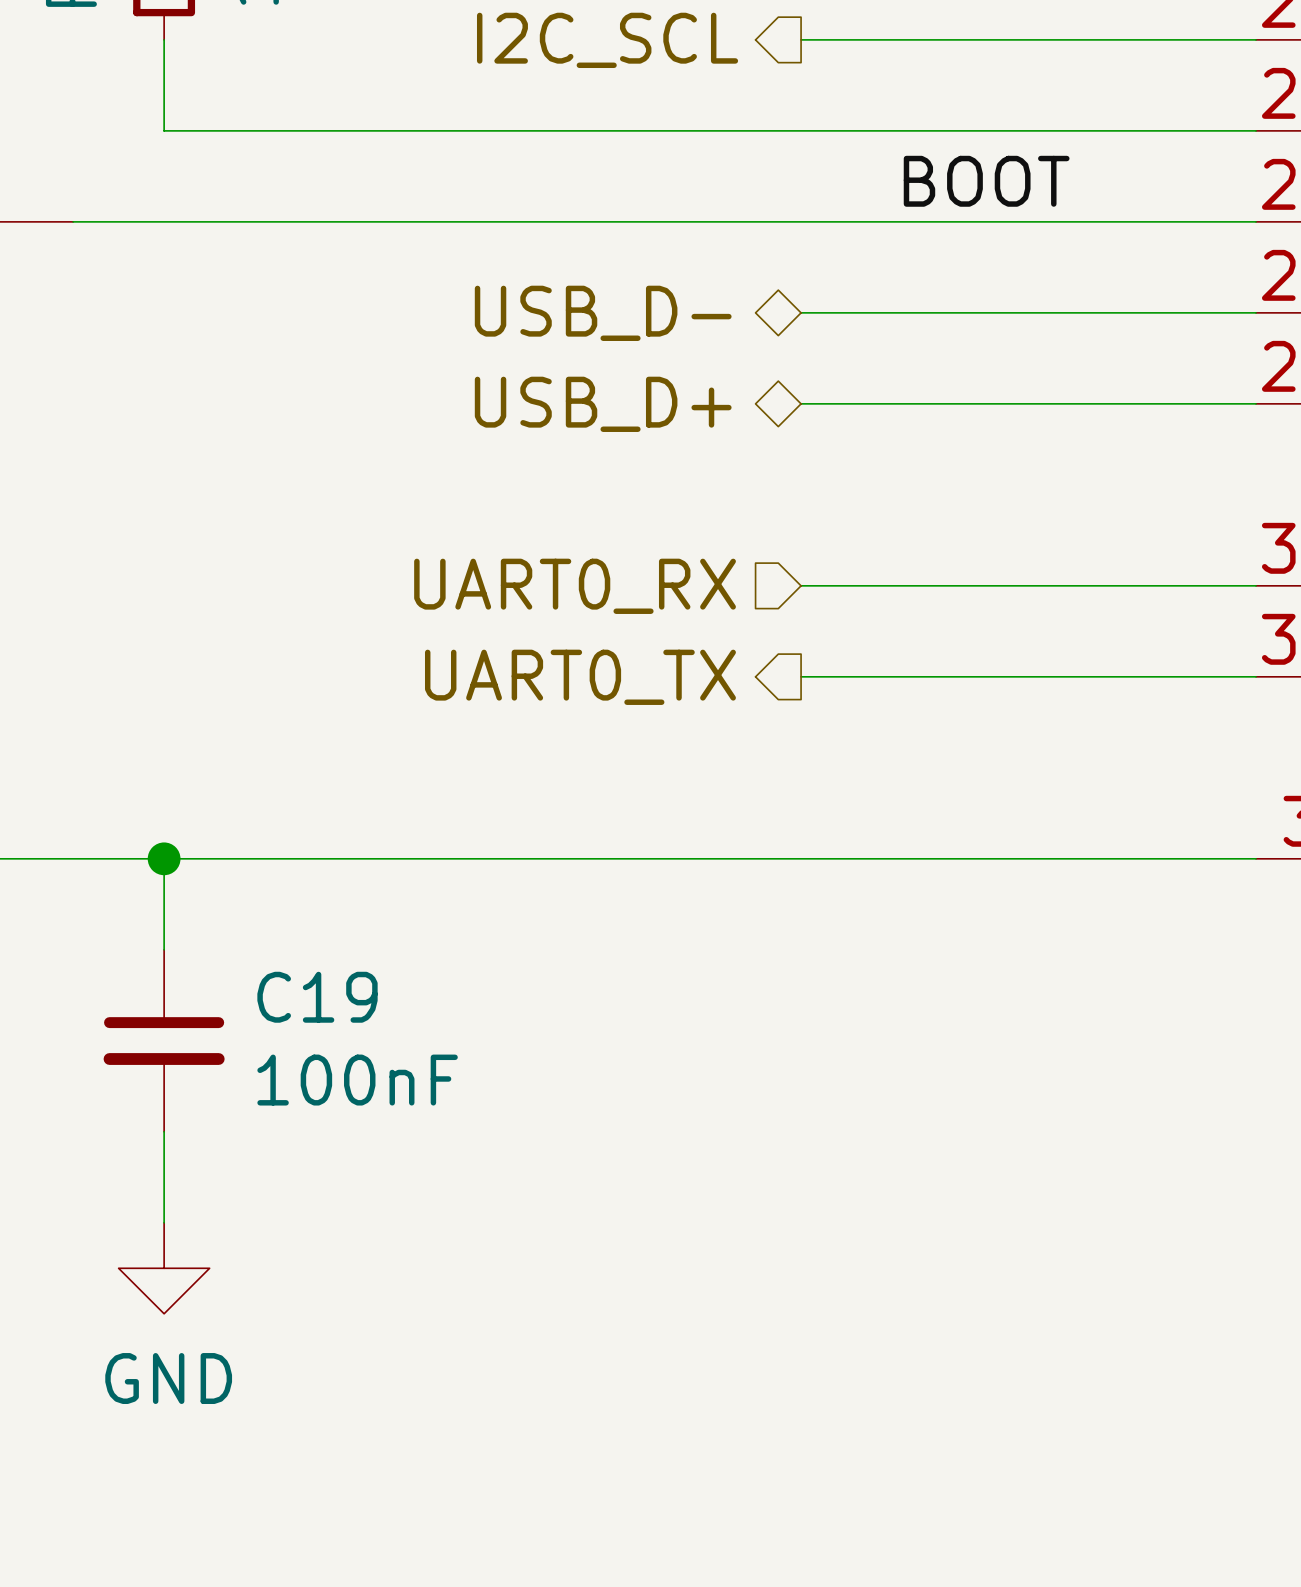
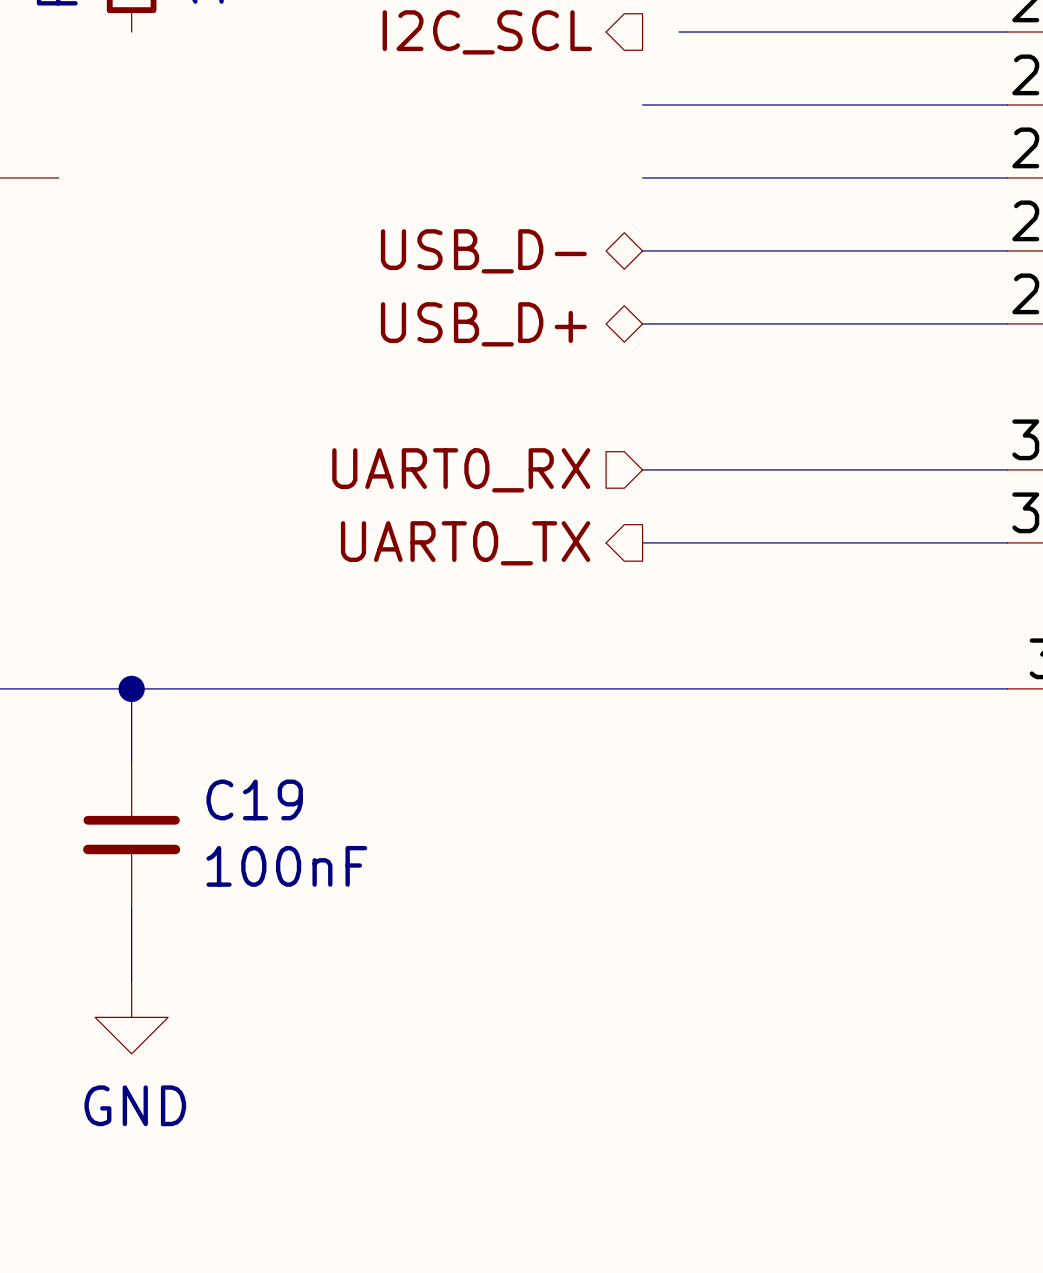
wire: (164, 39) (164, 130) (801, 130) -> none
wire: (801, 39) (846, 39) -> none
label: BOOT (986, 181) -> none
wire: (73, 221) (801, 221) -> none

